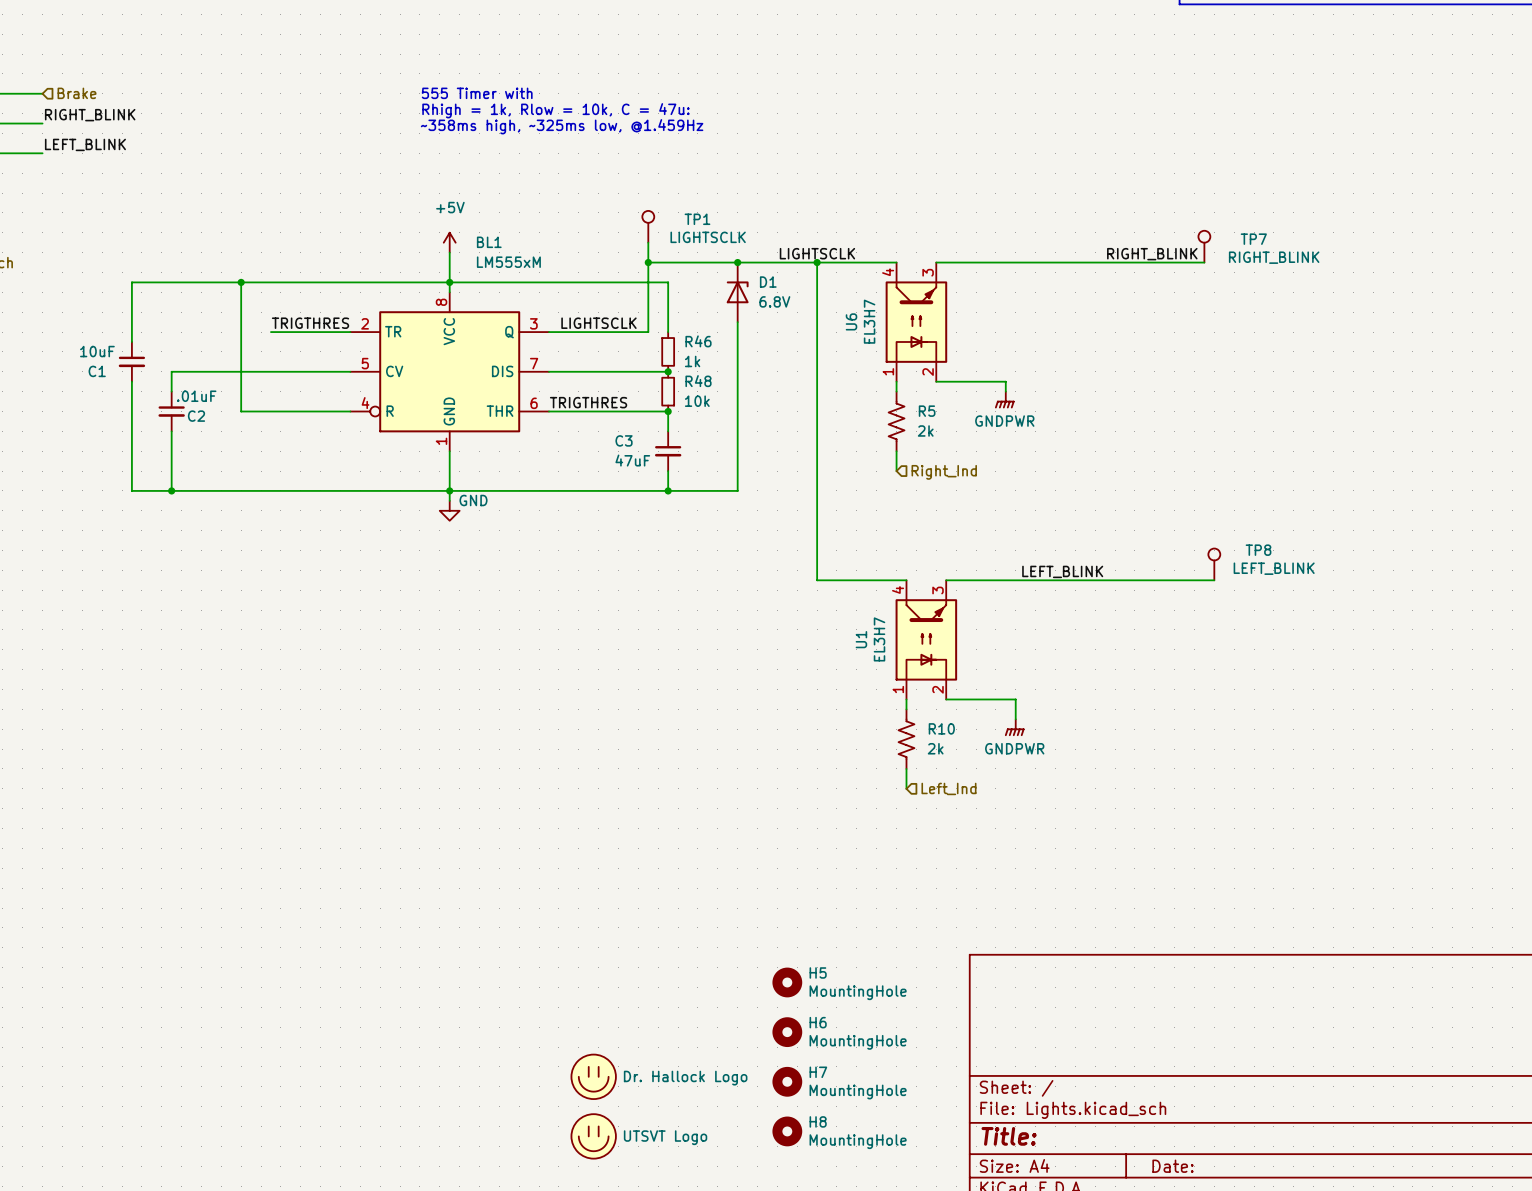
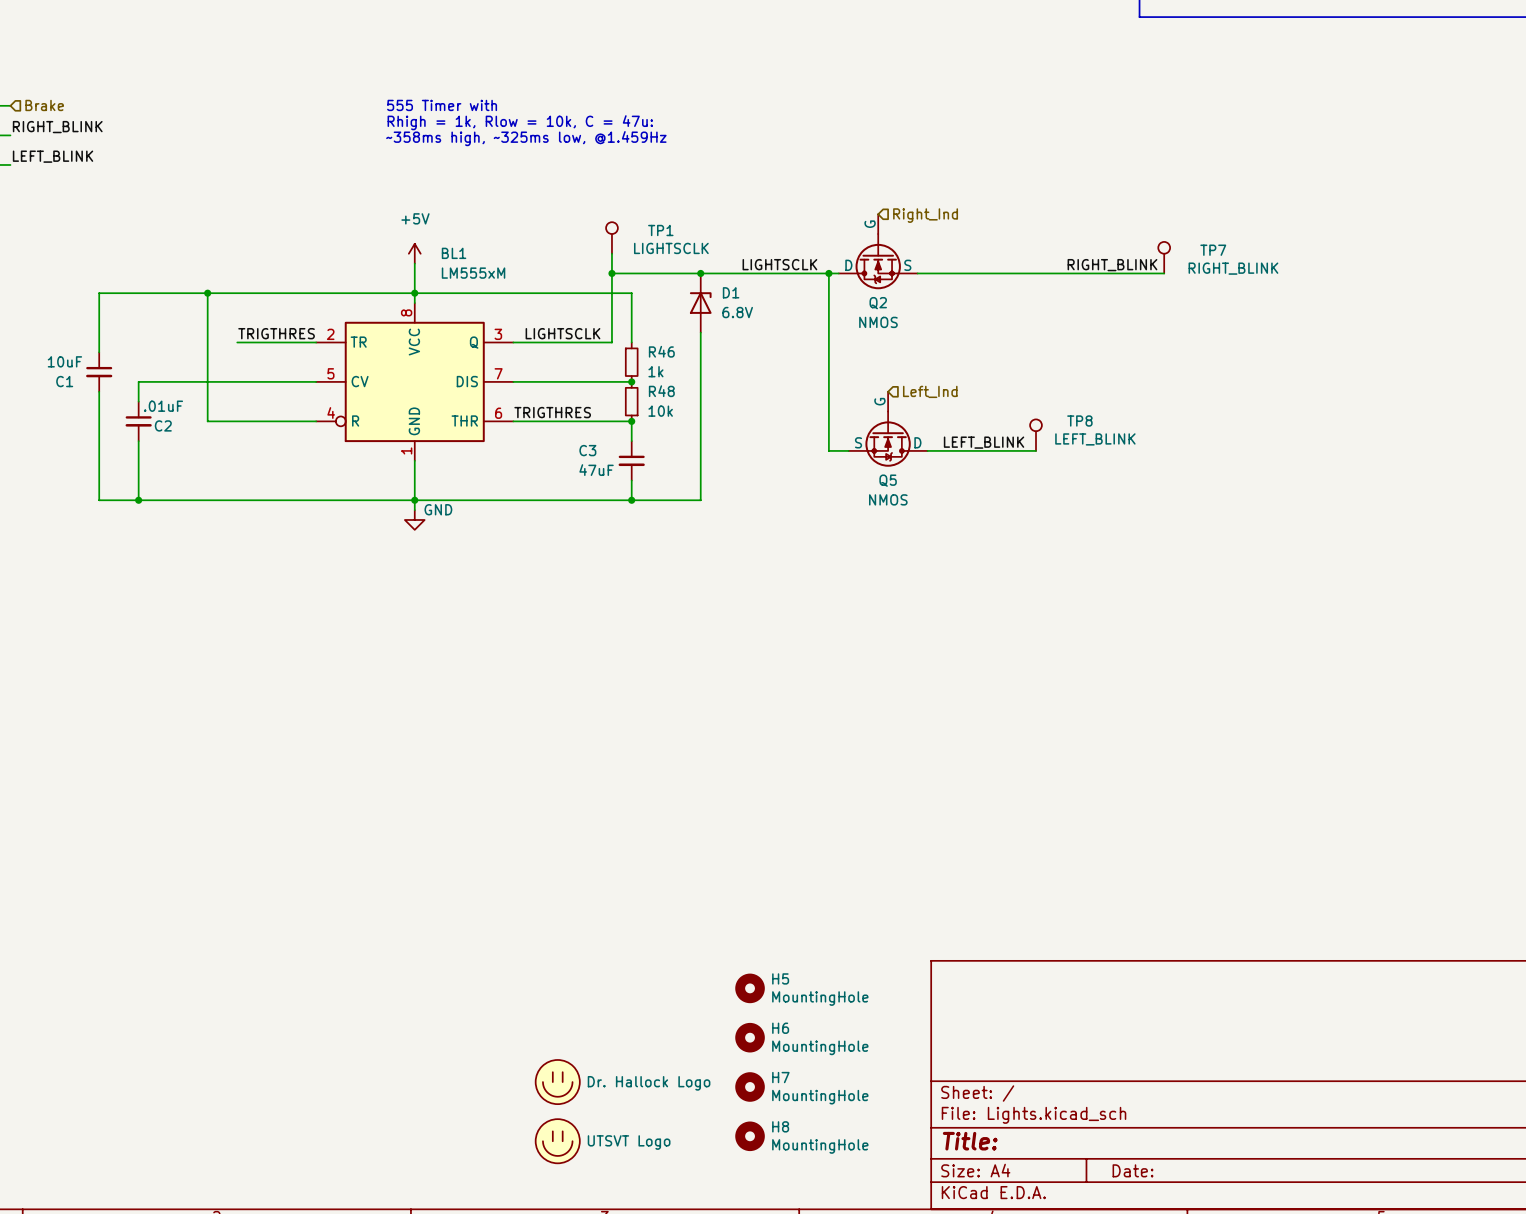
hierarchical label: none -> Right_Ind (925, 215)
Q2: none -> NMOS (878, 251)
wire: (817, 262) (817, 580) (906, 580) -> none
junction: (817, 262) -> none
wire: none -> (828, 273) (828, 450) (848, 450)
junction: none -> (828, 273)
U6: EL3H7 (916, 322) -> none
wire: (896, 381) (896, 391) -> none
wire: (936, 381) (1005, 381) (1005, 391) -> none
hierarchical label: none -> Left_Ind (930, 391)
power symbol: GNDPWR (1004, 399) -> none
Q5: none -> NMOS (888, 429)
R5: 2k (896, 421) -> none
wire: none -> (927, 450) (1036, 450)
wire: (896, 451) (896, 471) -> none
hierarchical label: Right_Ind (944, 472) -> none
TP8 position: (1214, 564) -> (1036, 435)
label position: LEFT_BLINK (1062, 571) -> LEFT_BLINK (984, 442)
wire: (946, 580) (1214, 580) -> none
U1: EL3H7 (926, 639) -> none
wire: (906, 699) (906, 709) -> none
wire: (946, 699) (1015, 699) (1015, 719) -> none
power symbol: GNDPWR (1014, 727) -> none
R10: 2k (906, 739) -> none
wire: (906, 768) (906, 788) -> none
hierarchical label: Left_Ind (948, 788) -> none

